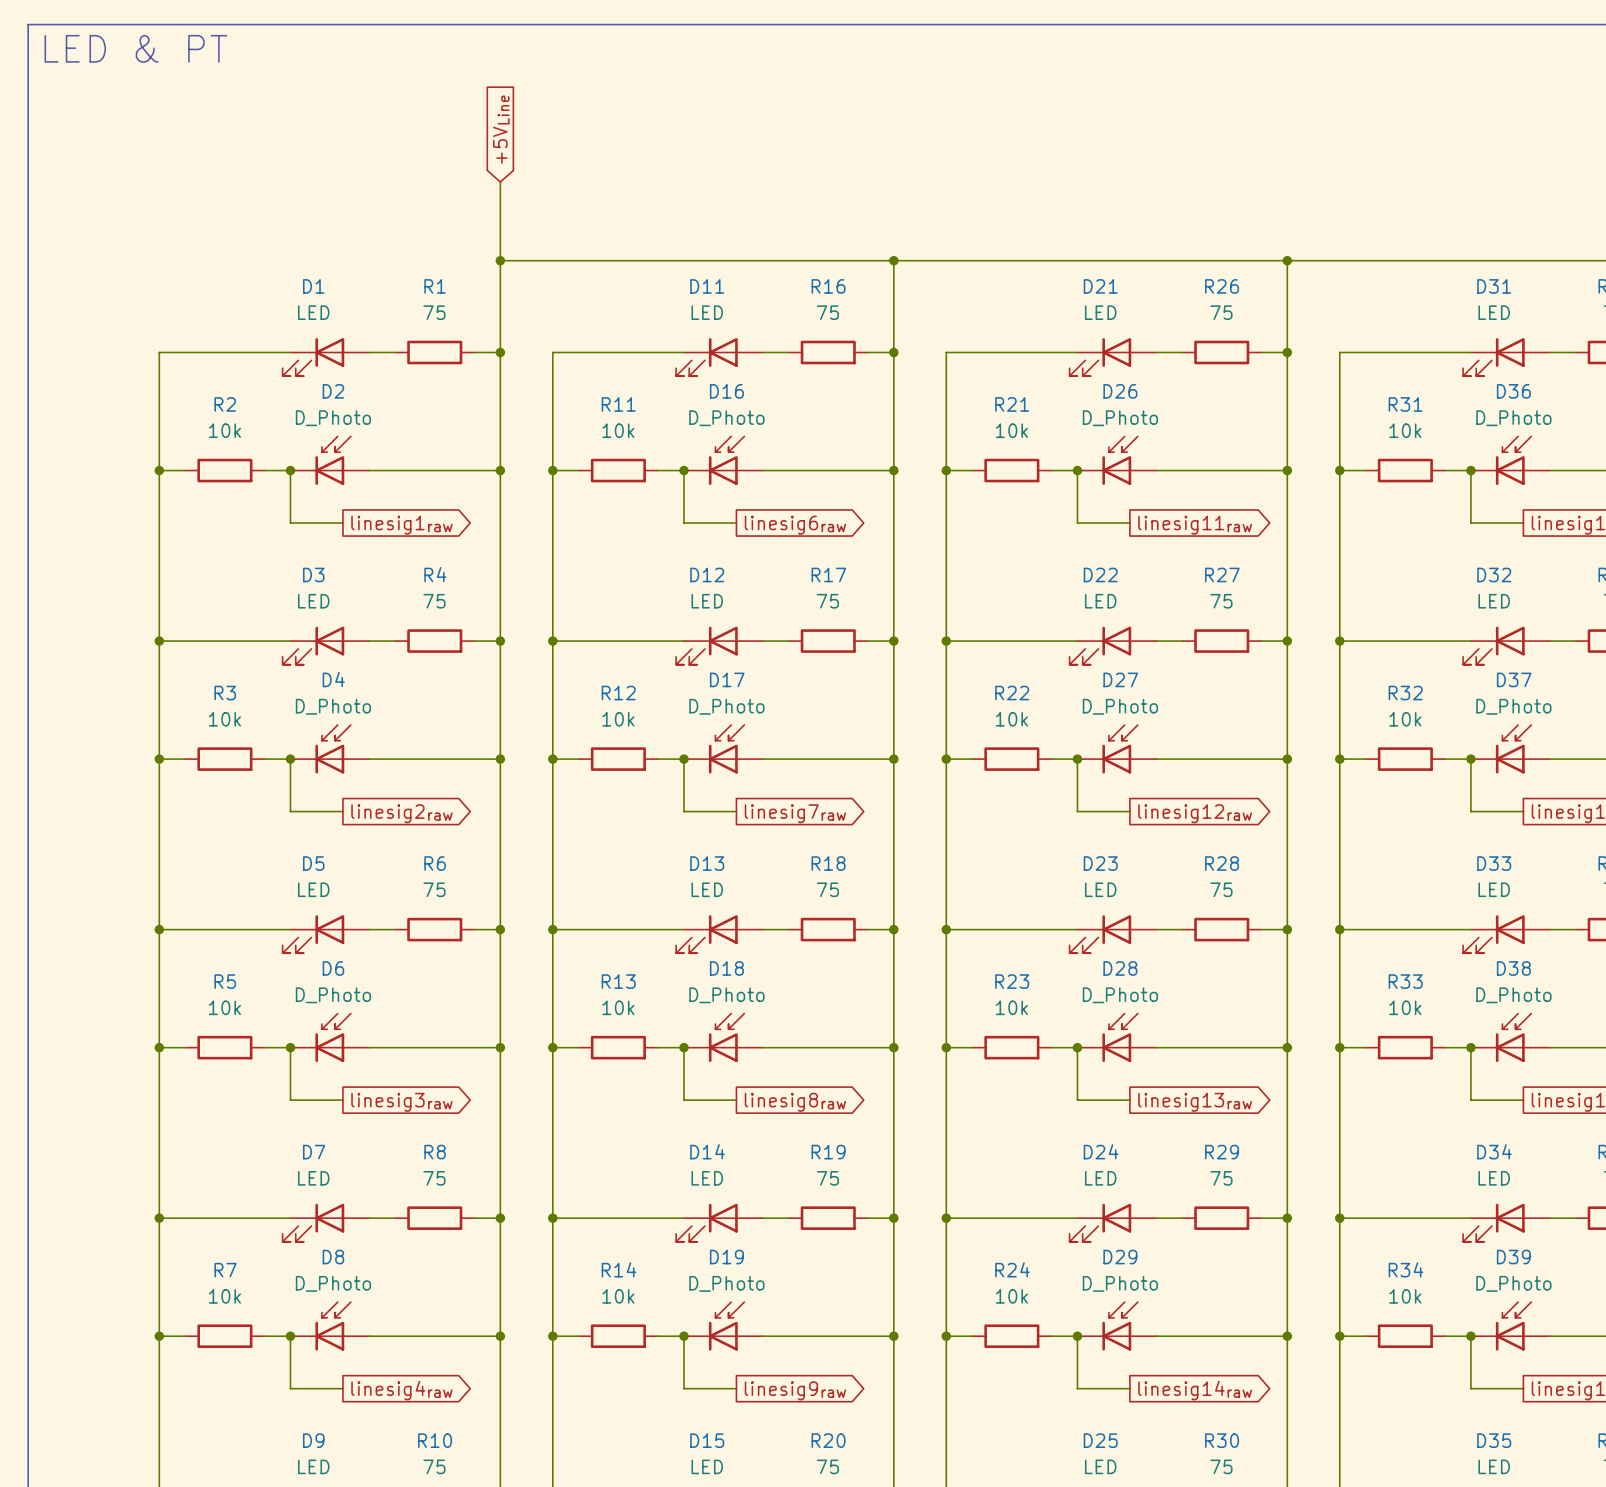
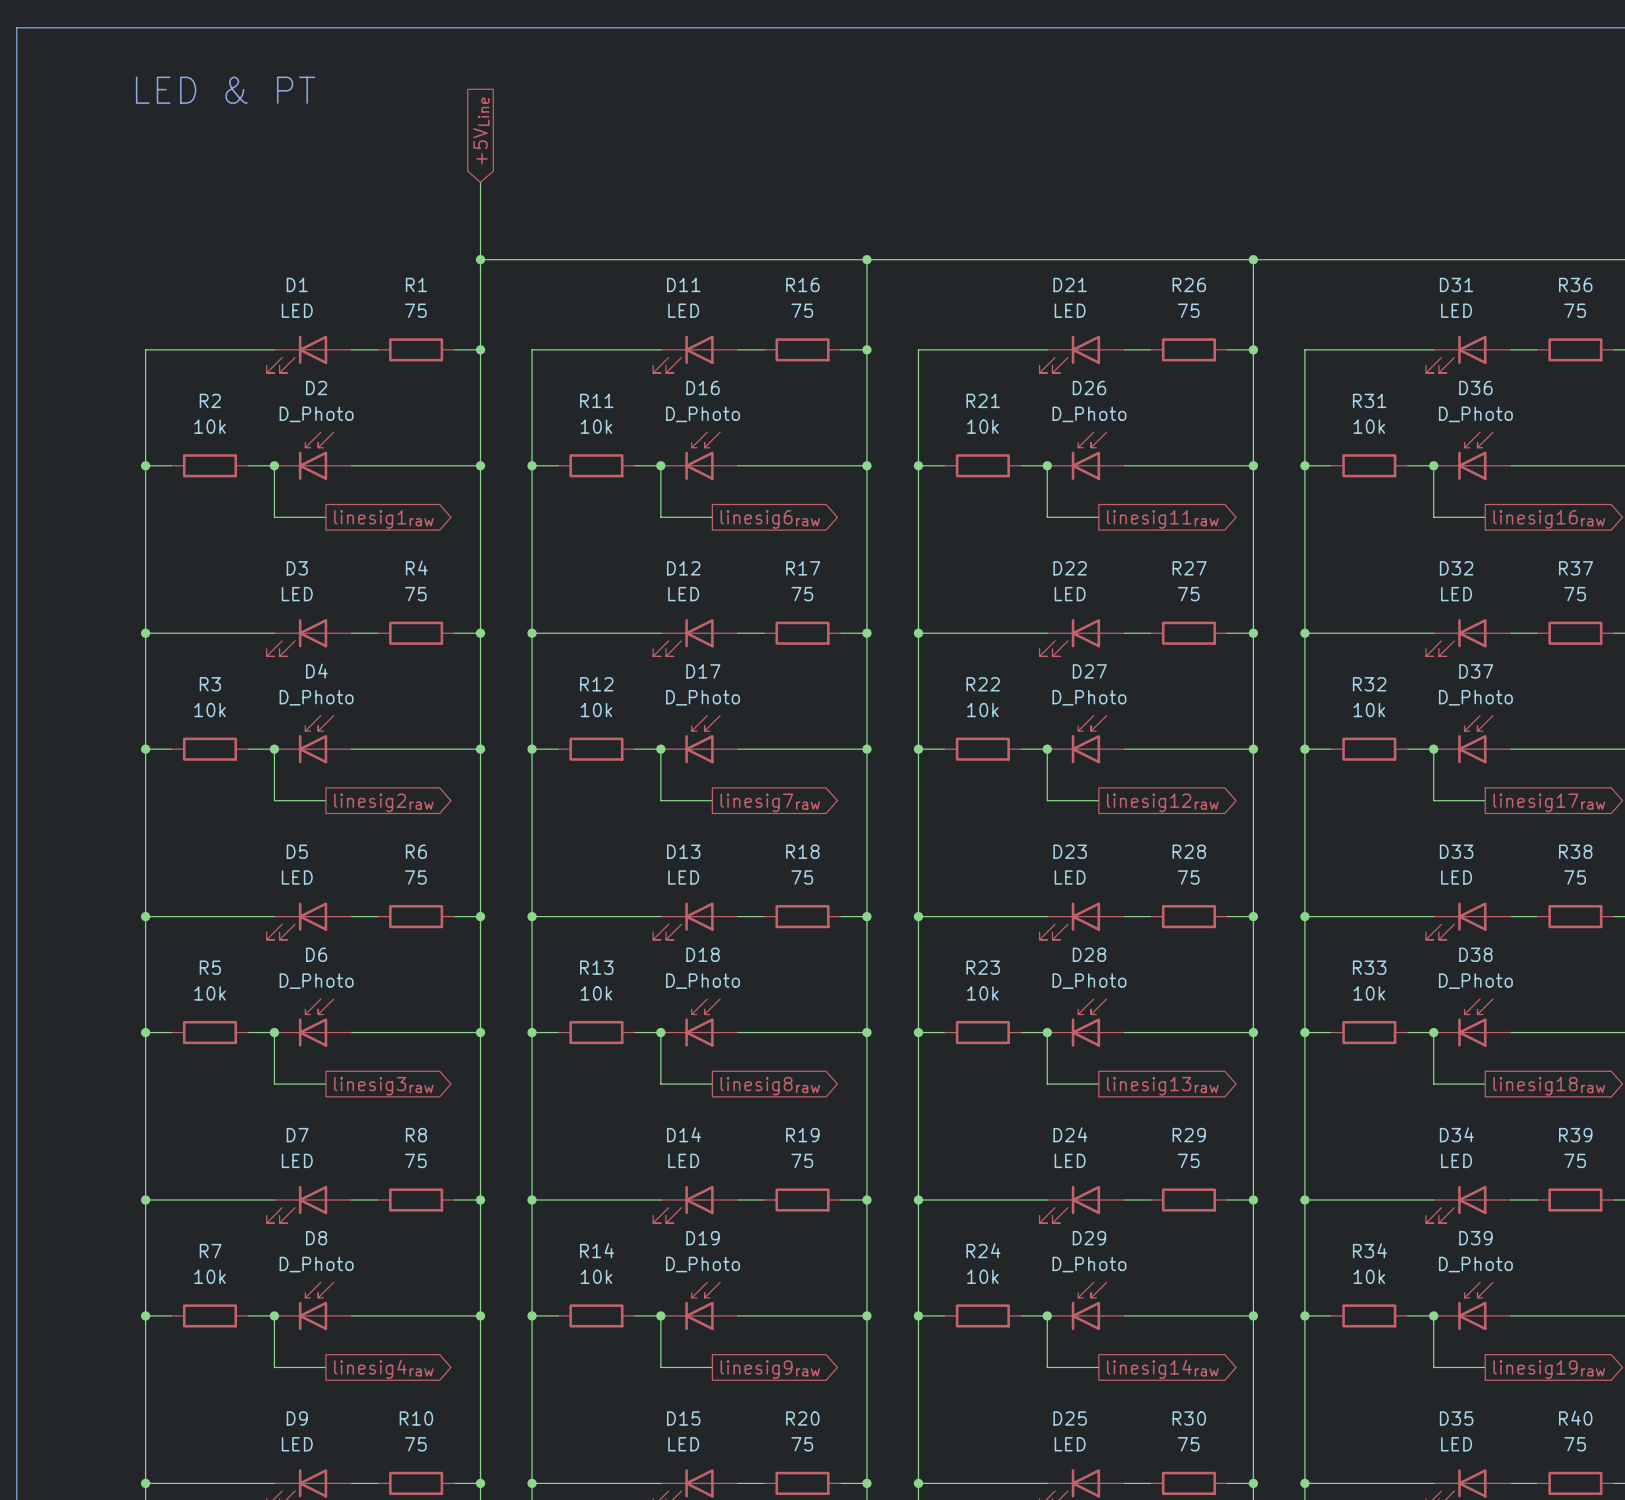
text position: LED & PT (135, 48) -> LED & PT (225, 90)

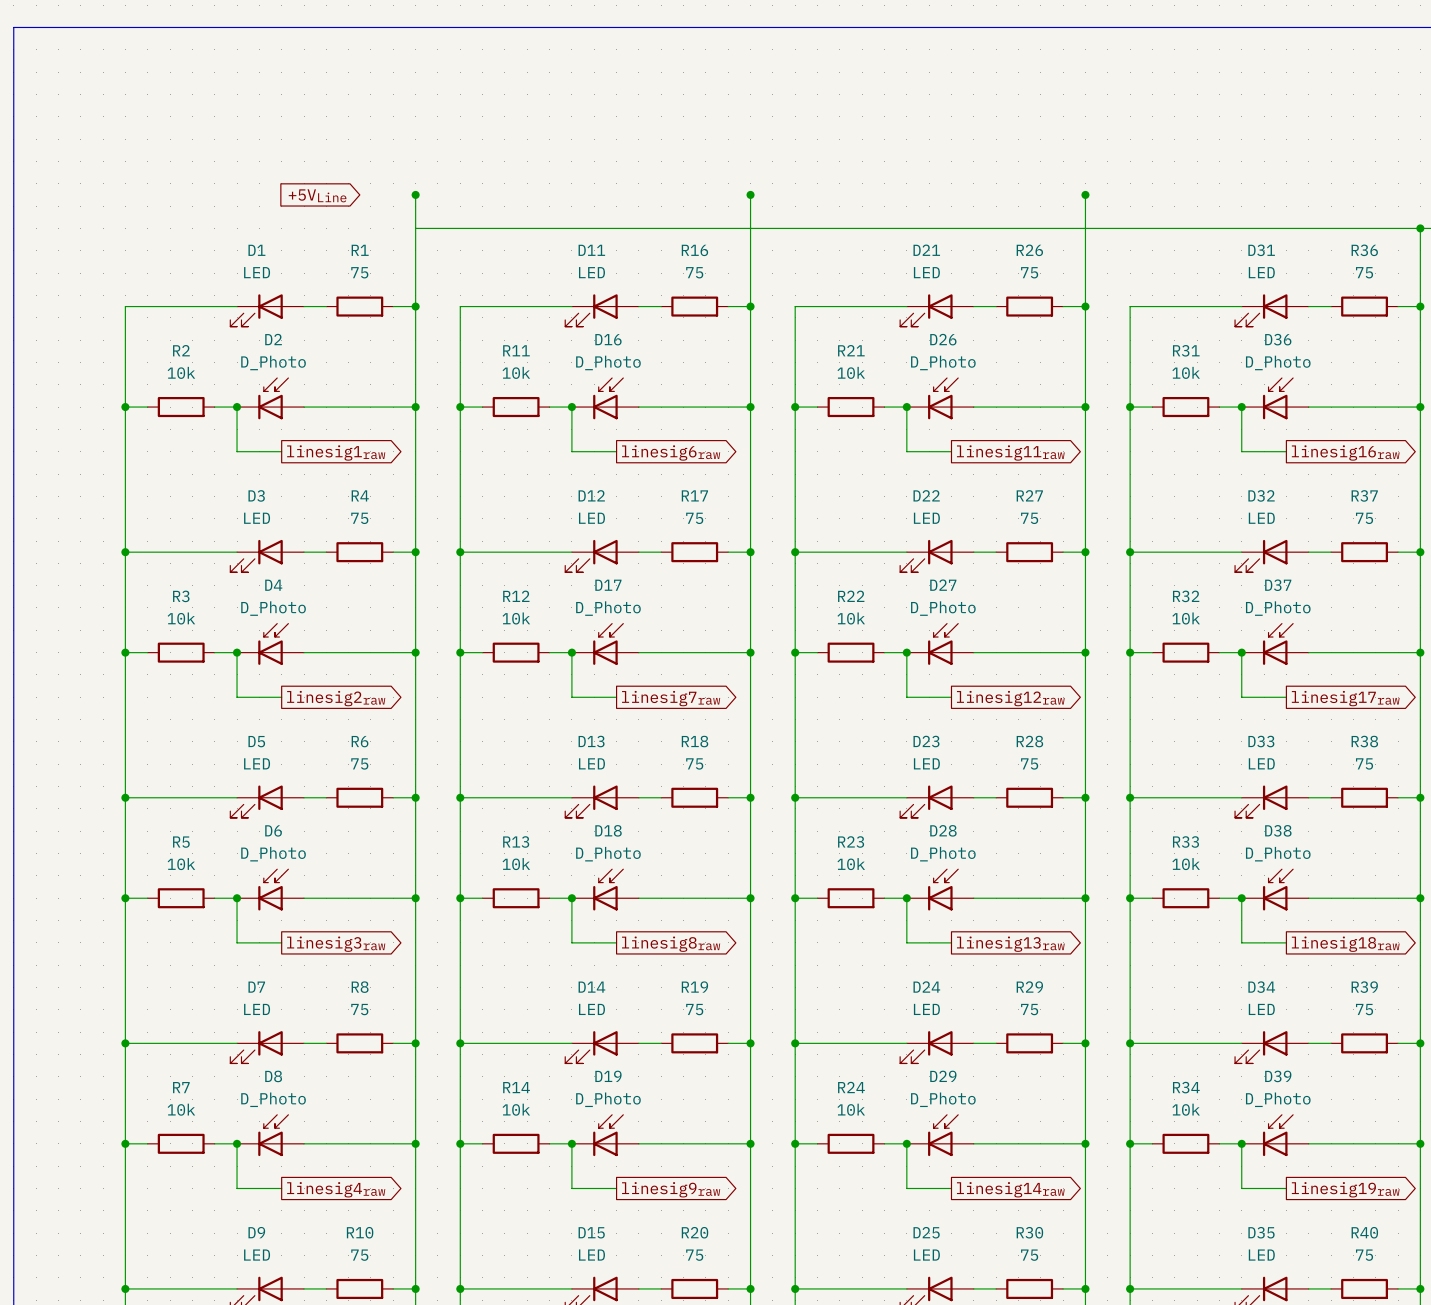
text: LED & PT (225, 90) -> none
global label rotation: 0° (481, 131) -> 90° counterclockwise (317, 195)
global label position: +5VLine (481, 131) -> +5VLine (317, 195)
wire: (480, 182) (480, 221) -> none
wire: none -> (750, 194) (750, 228)
wire: none -> (1085, 194) (1085, 228)
junction position: (480, 259) -> (415, 194)
junction position: (866, 259) -> (750, 194)
junction position: (1253, 259) -> (1085, 194)

